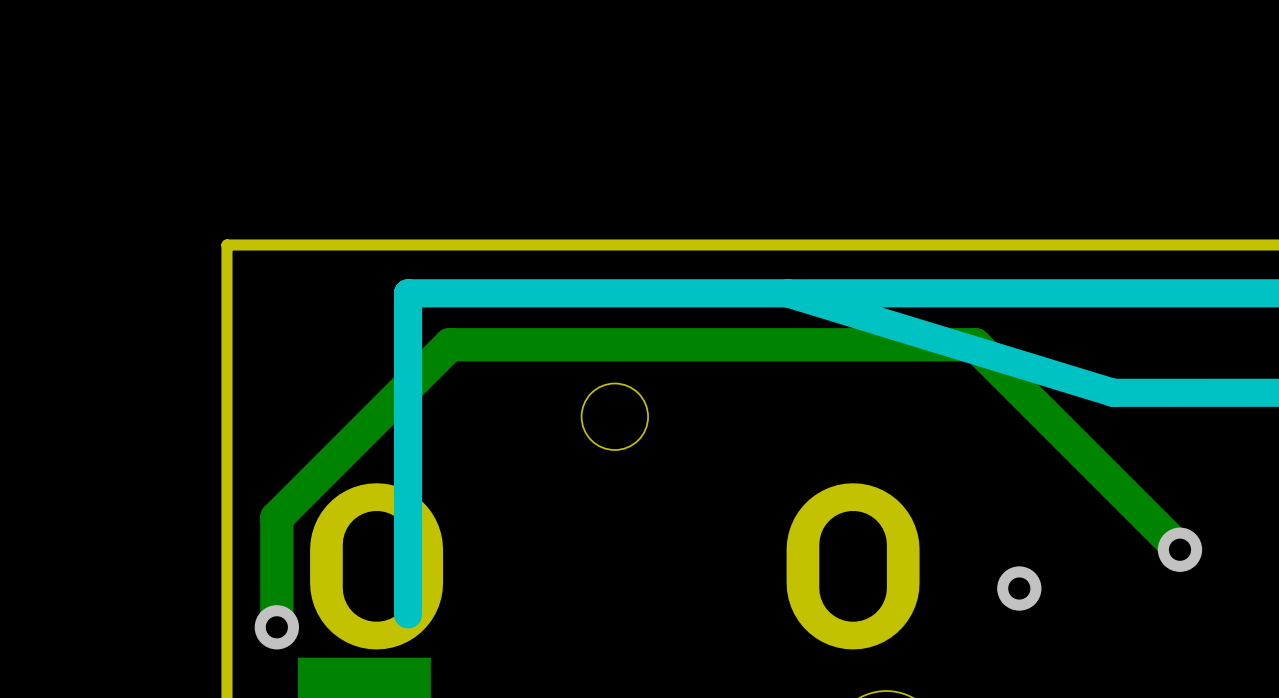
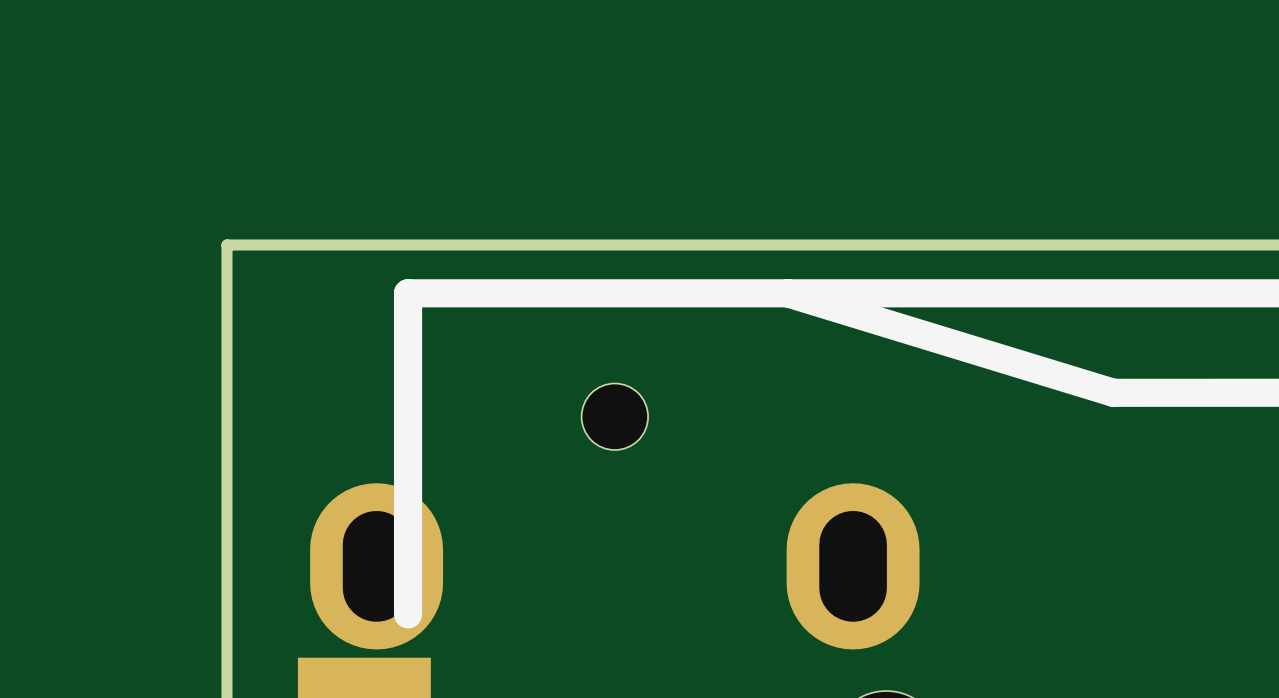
track: (1179, 549) (974, 344) (449, 344) (276, 517) (276, 627) -> none
via: (1179, 549) -> none
via: (1019, 588) -> none
via: (276, 627) -> none

